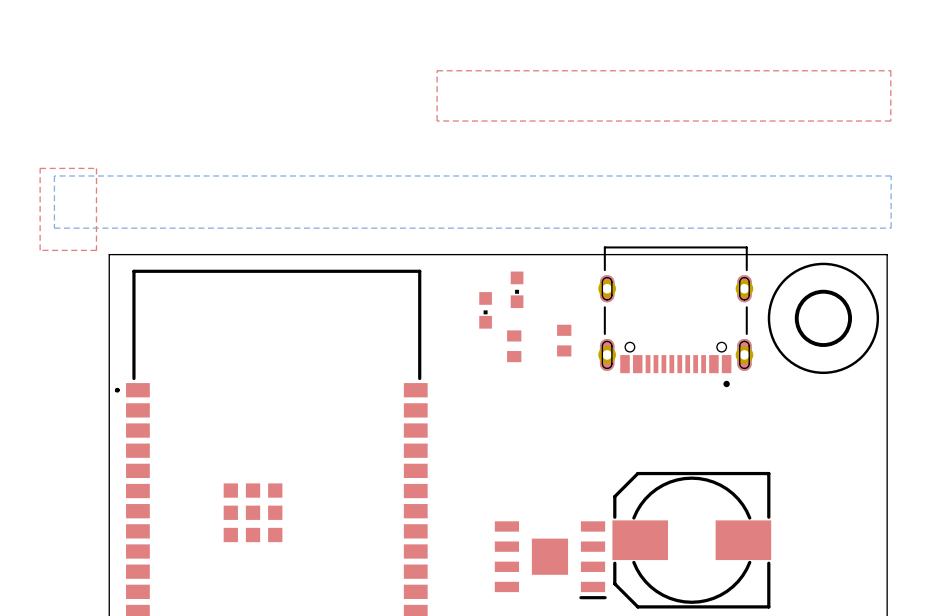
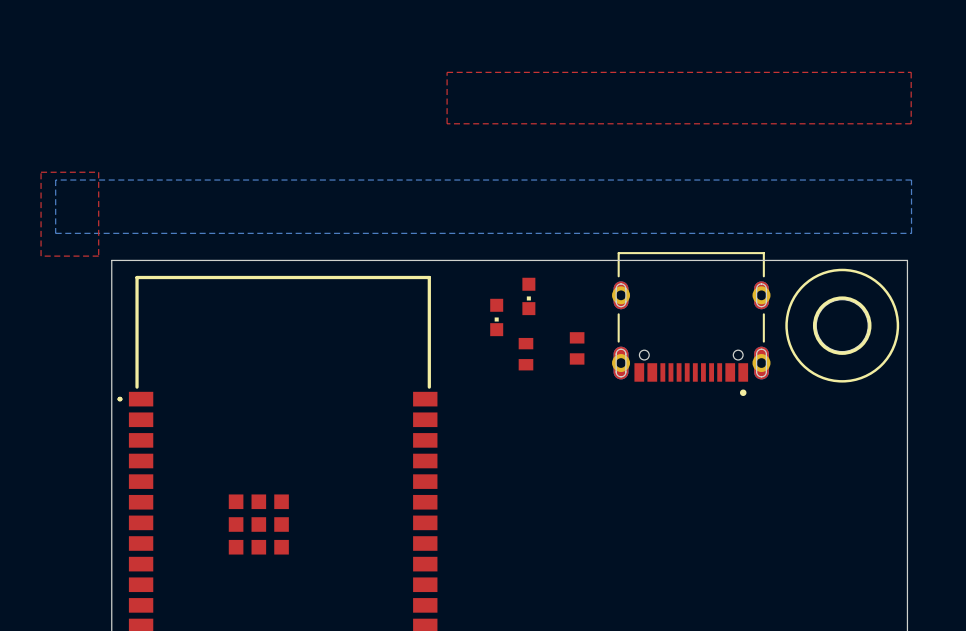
part: (691, 540) -> none
part: (550, 560) -> none

